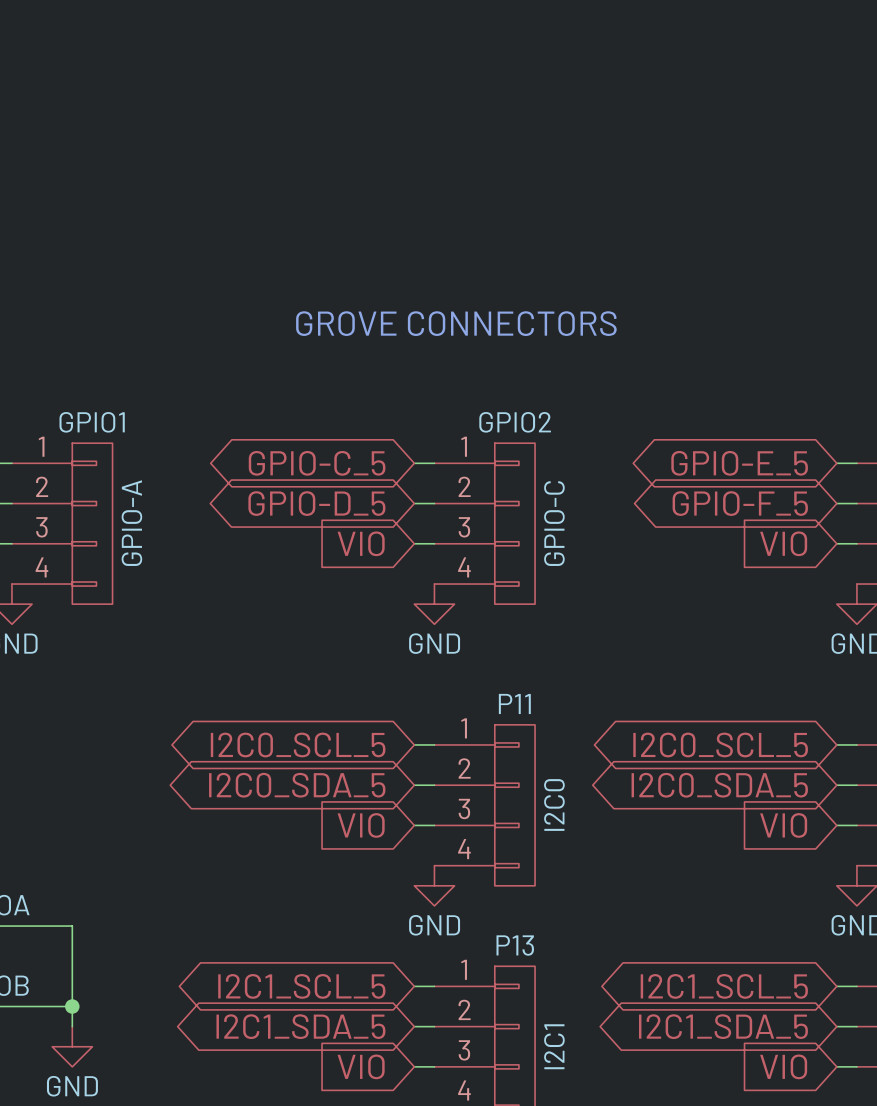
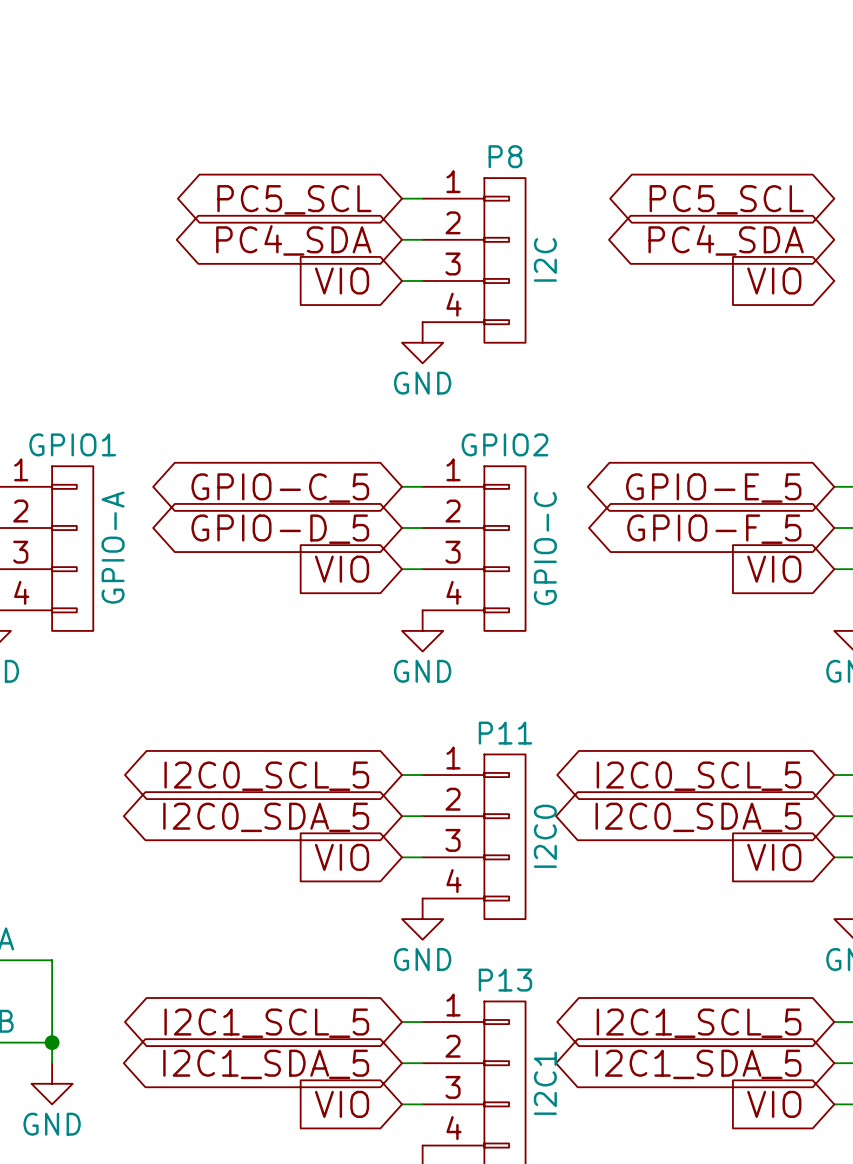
global label: none -> PC5_SCL (294, 199)
wire: none -> (402, 198) (422, 198)
global label: none -> PC5_SCL (726, 199)
global label: none -> PC4_SDA (293, 240)
wire: none -> (402, 239) (422, 239)
global label: none -> PC4_SDA (726, 240)
P8: none -> I2C (474, 260)
global label: none -> VIO (342, 280)
wire: none -> (402, 280) (422, 280)
global label: none -> VIO (774, 280)
power symbol: none -> GND (422, 342)
text: GROVE CONNECTORS (456, 323) -> none

